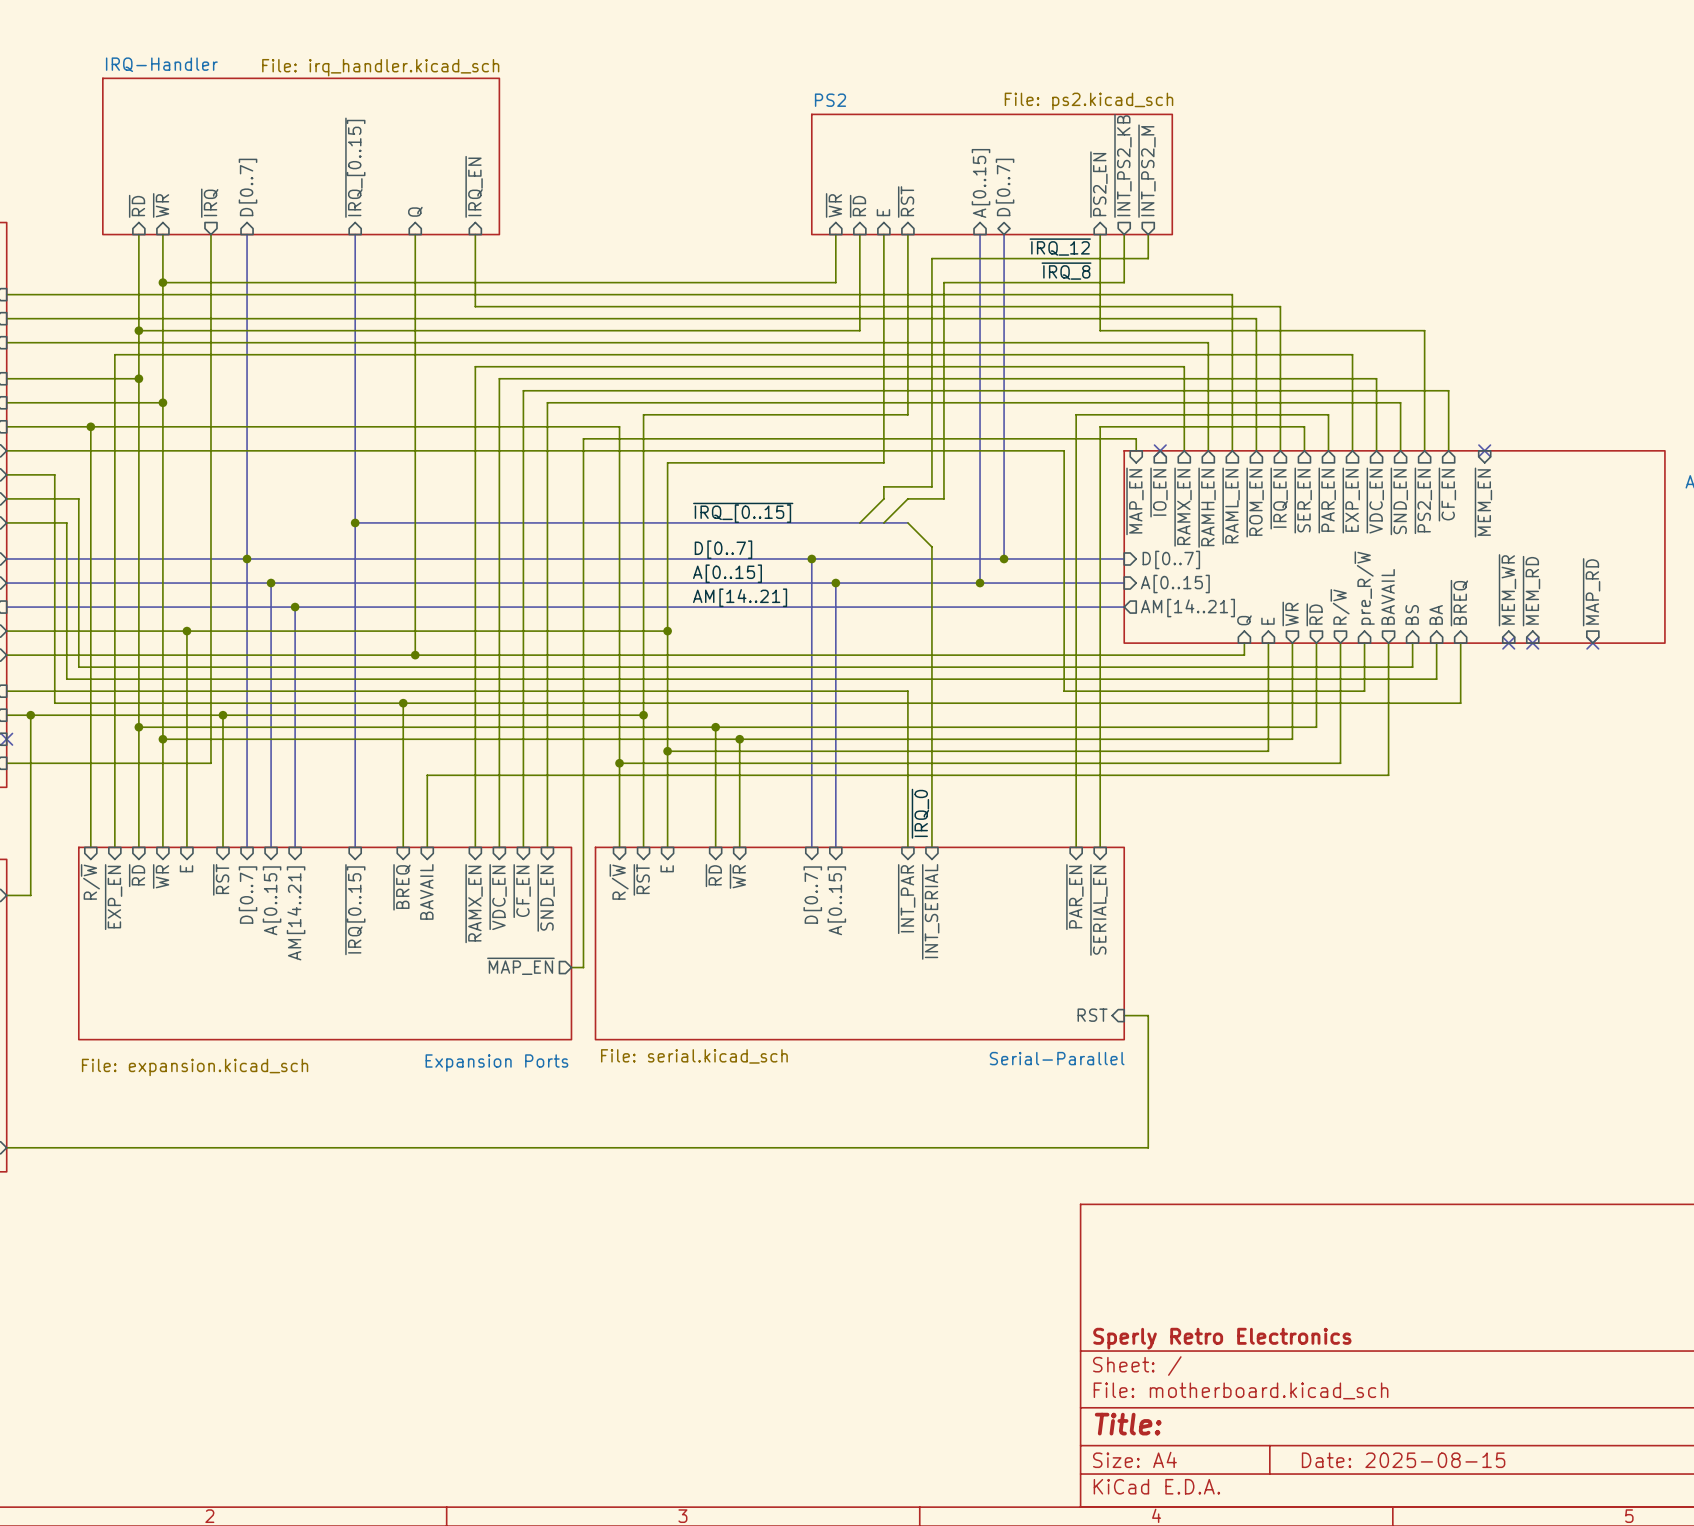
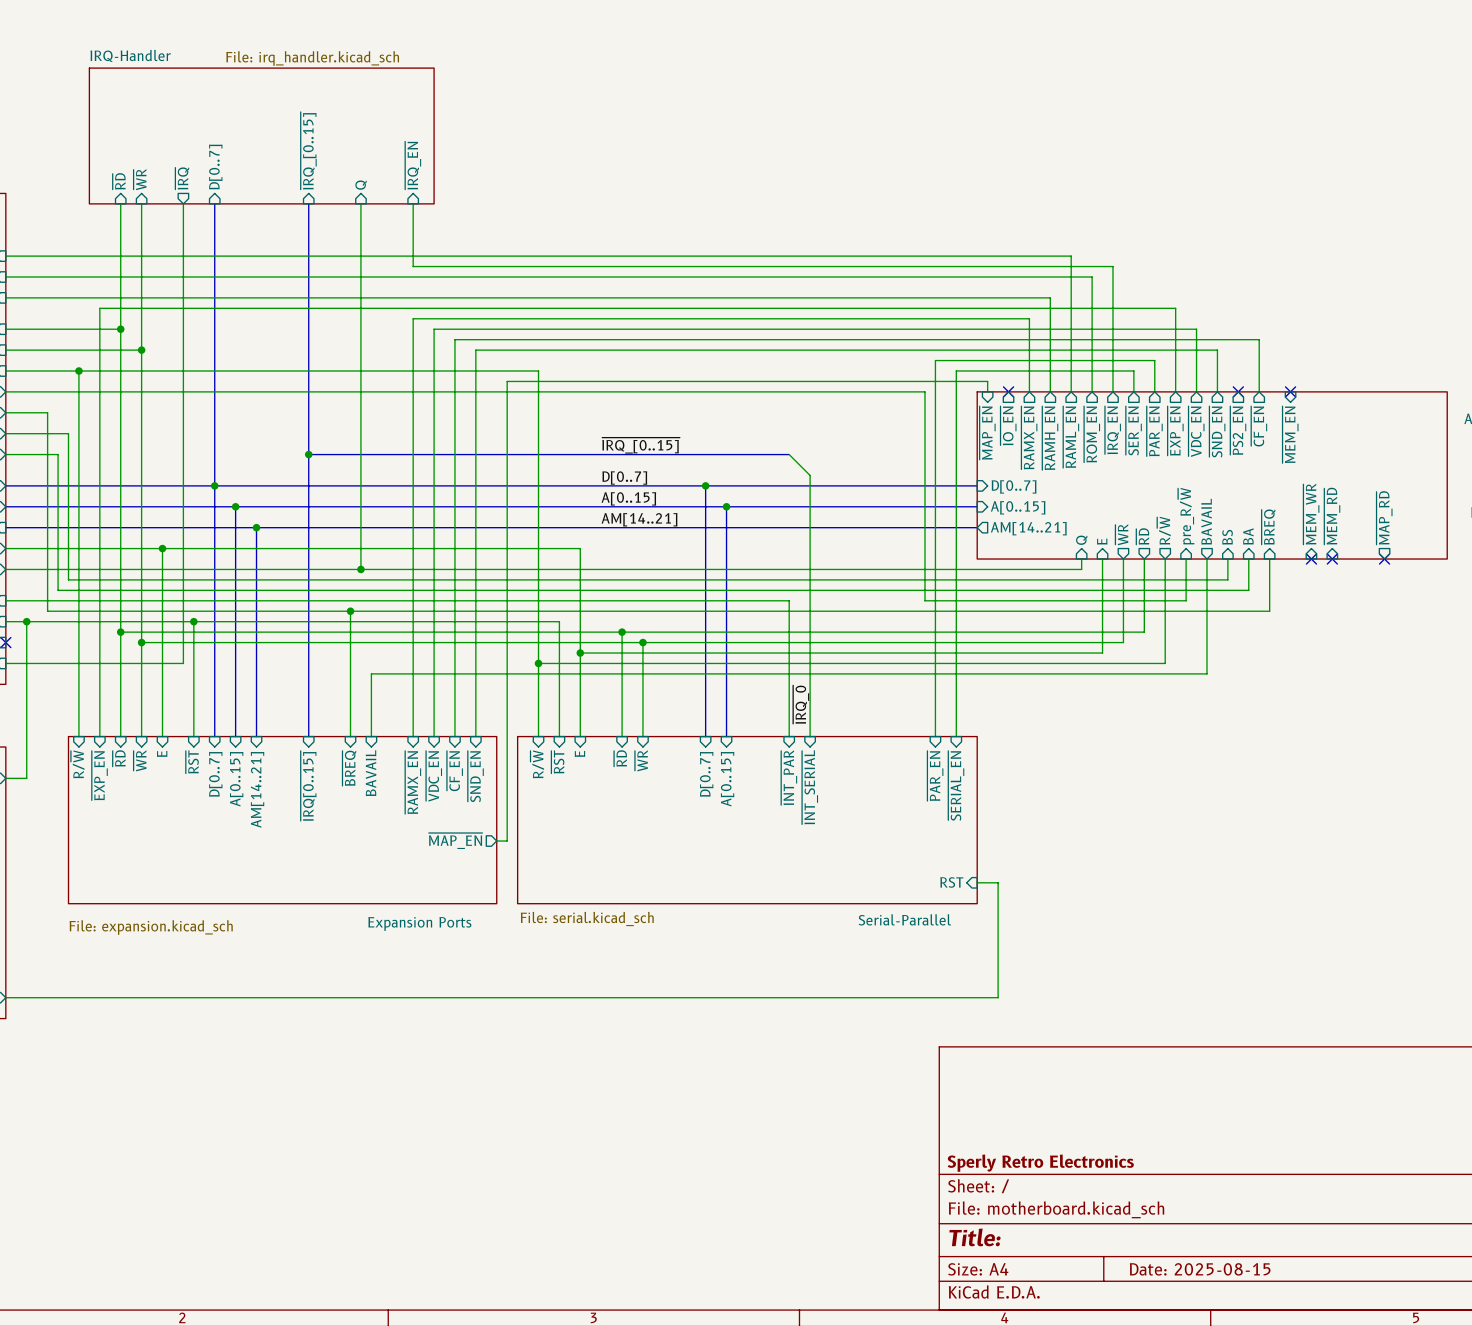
sheet pin: ~{INT_PS2_KB} (1122, 165) -> none
sheet pin: ~{INT_PS2_M} (1146, 171) -> none
sheet PS2: File: ps2.kicad_sch (992, 174) -> none
sheet pin: A[0..15] (981, 183) -> none
sheet pin: ~{PS2_EN} (1098, 184) -> none
sheet pin: D[0..7] (1005, 187) -> none
sheet pin: ~{RST} (906, 202) -> none
sheet pin: ~{WR} (834, 205) -> none
sheet pin: ~{RD} (858, 206) -> none
sheet pin: E (883, 212) -> none
wire: (835, 234) (835, 282) (162, 282) -> none
wire: (859, 234) (859, 330) (138, 330) -> none
wire: (883, 234) (883, 462) (667, 462) (667, 631) -> none
wire: (907, 234) (907, 414) (643, 414) (643, 715) -> none
bus: (980, 234) (980, 583) -> none
bus: (1004, 234) (1004, 558) -> none
wire: (1100, 234) (1100, 330) (1424, 330) (1424, 450) -> none
wire: (1124, 234) (1124, 282) (943, 282) (943, 498) (907, 498) (883, 522) -> none
wire: (1148, 234) (1148, 258) (931, 258) (931, 486) (883, 486) (883, 498) (859, 522) -> none
label: ~{IRQ_12} (1060, 247) -> none
label: ~{IRQ_8} (1066, 271) -> none
junction: (162, 282) -> none
junction: (138, 330) -> none
no-connect mark: none -> (1238, 391)
junction: (1004, 558) -> none
junction: (980, 583) -> none
junction: (667, 631) -> none
junction: (643, 715) -> none

